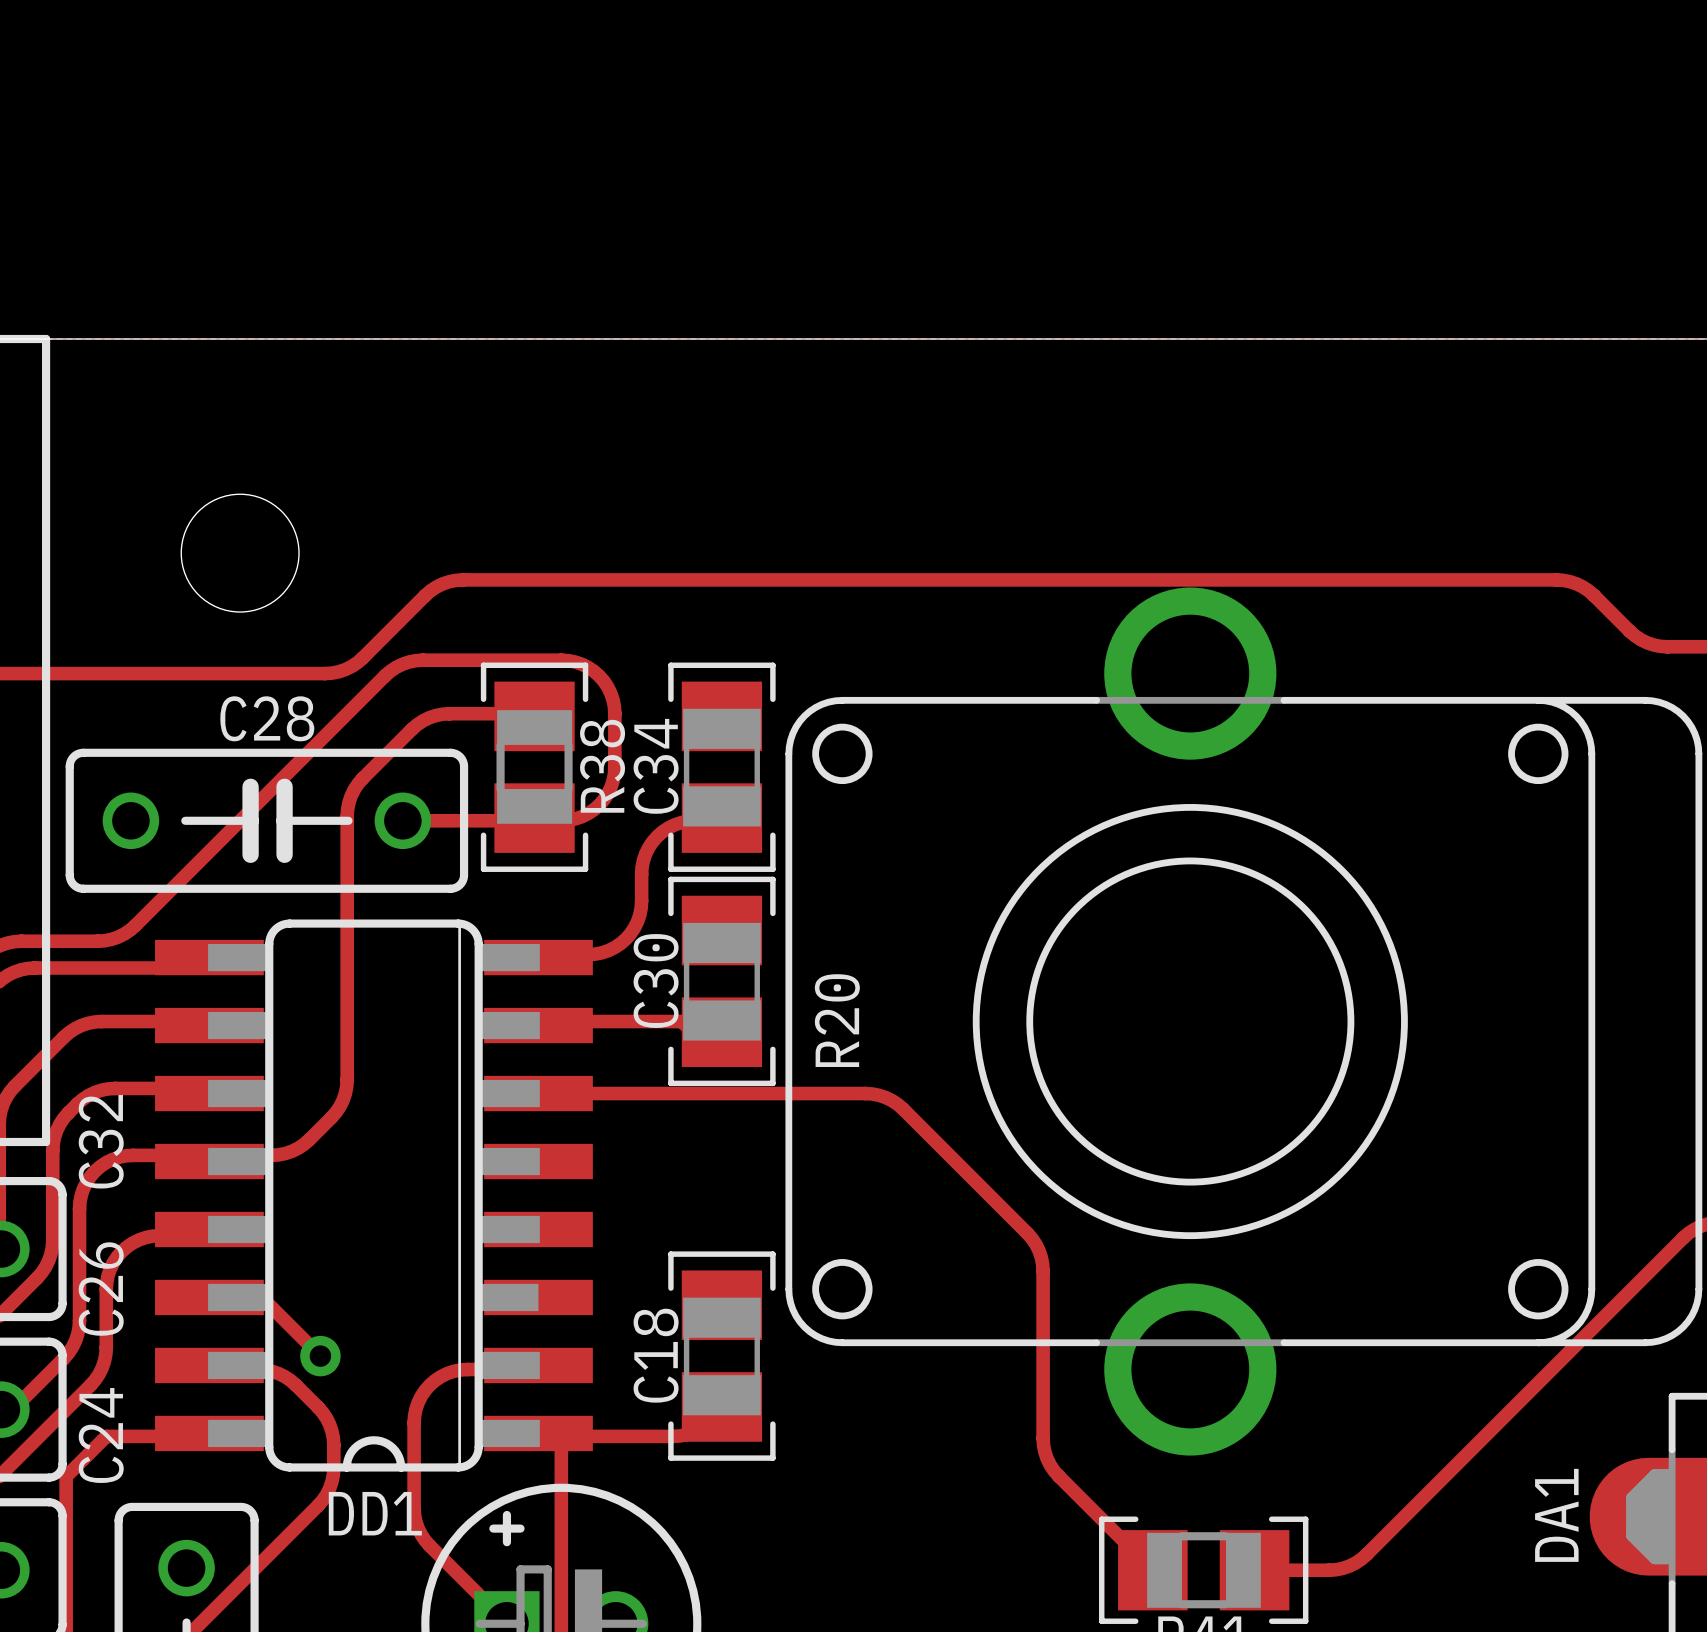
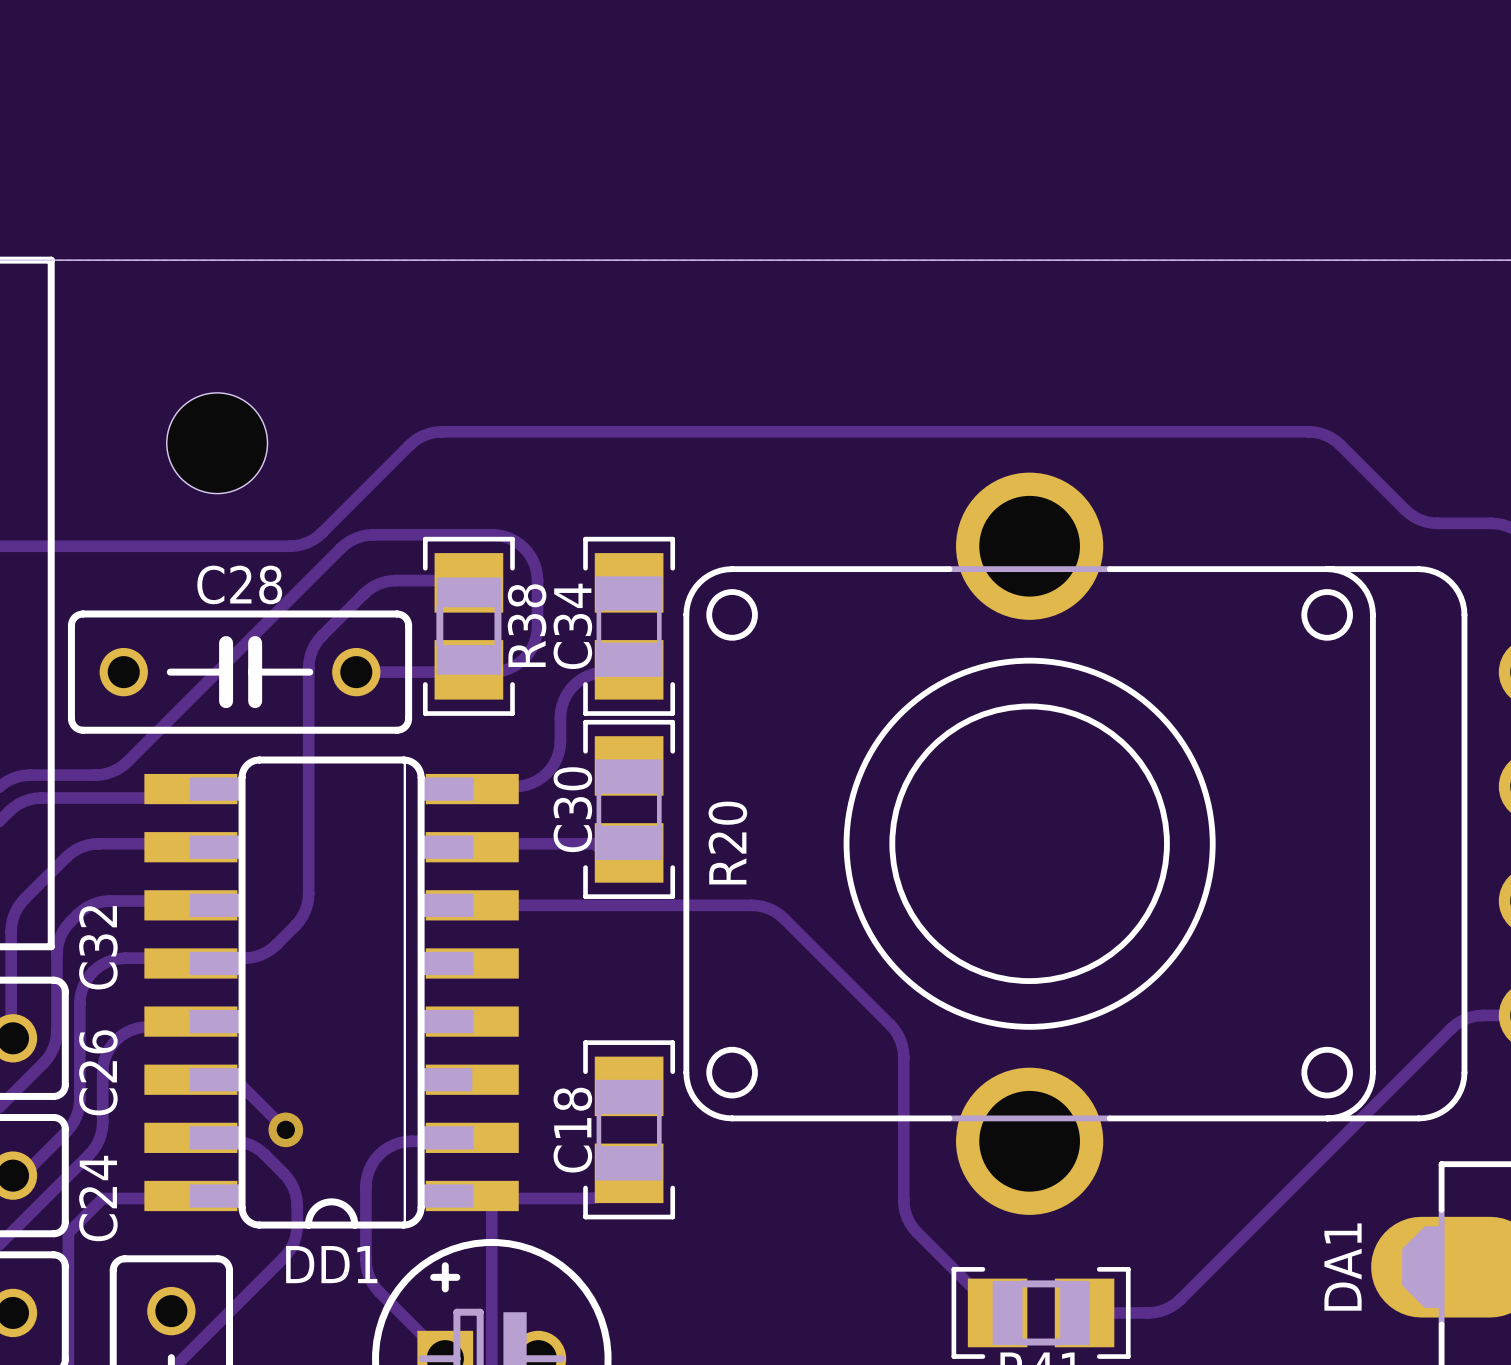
track: (425, 595) (442, 583) (463, 579) (1556, 579) (1576, 583) (1594, 595) -> (375, 479) (414, 441) (424, 435) (442, 431) (1308, 431) (1325, 435) (1336, 441) (1374, 479)

